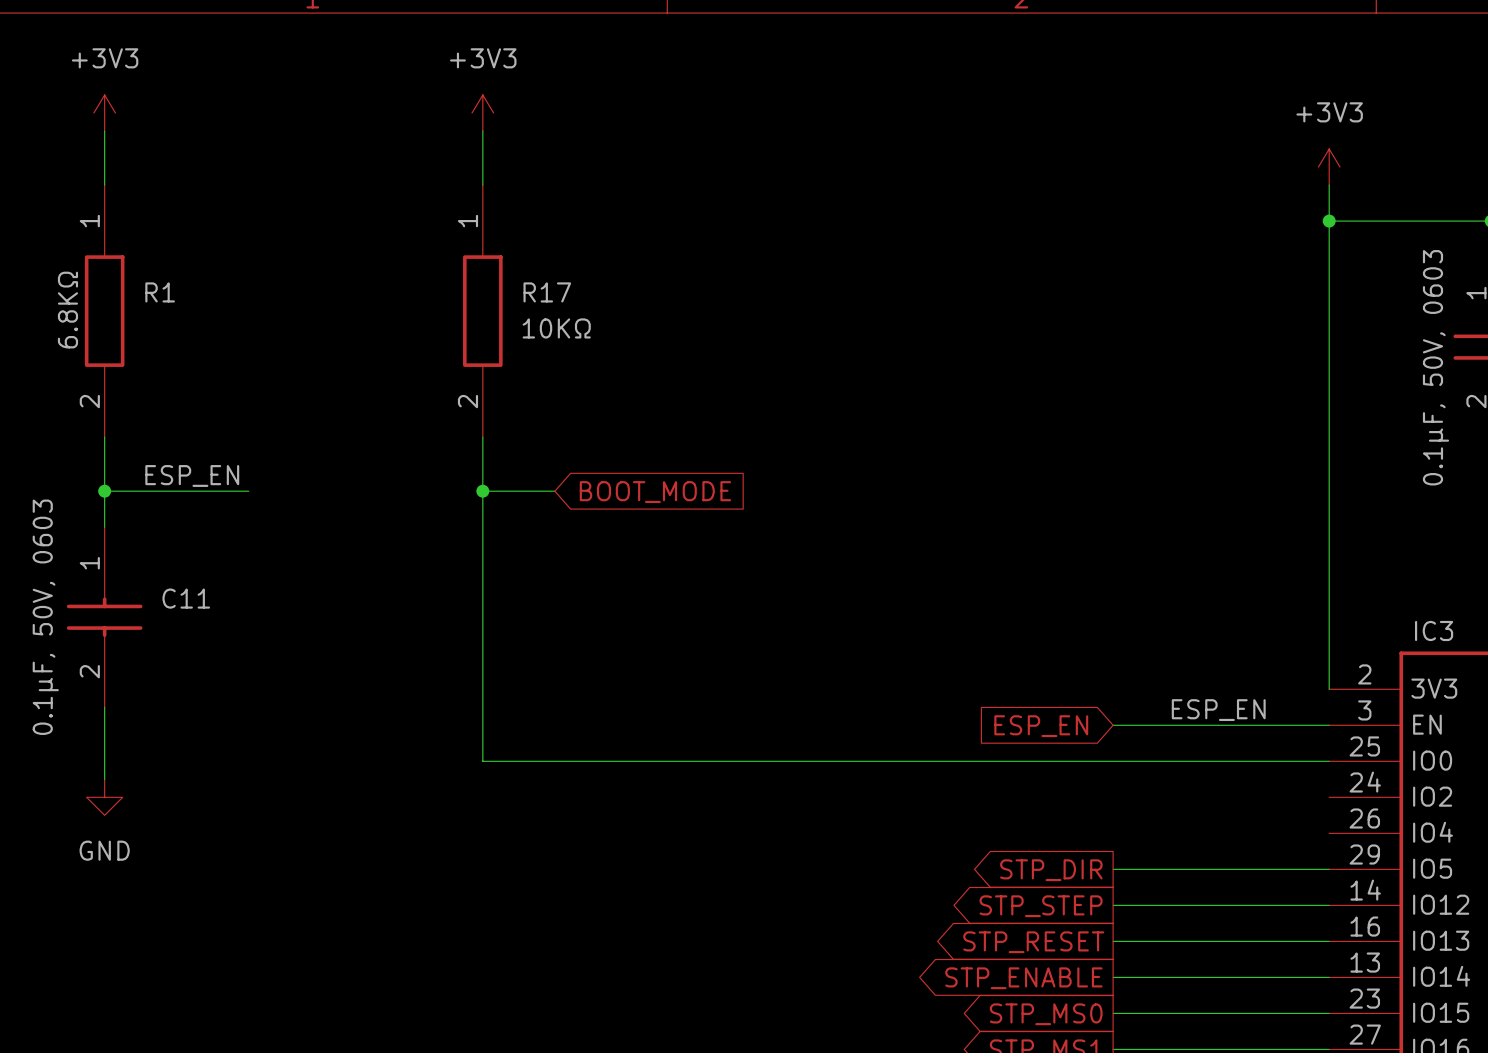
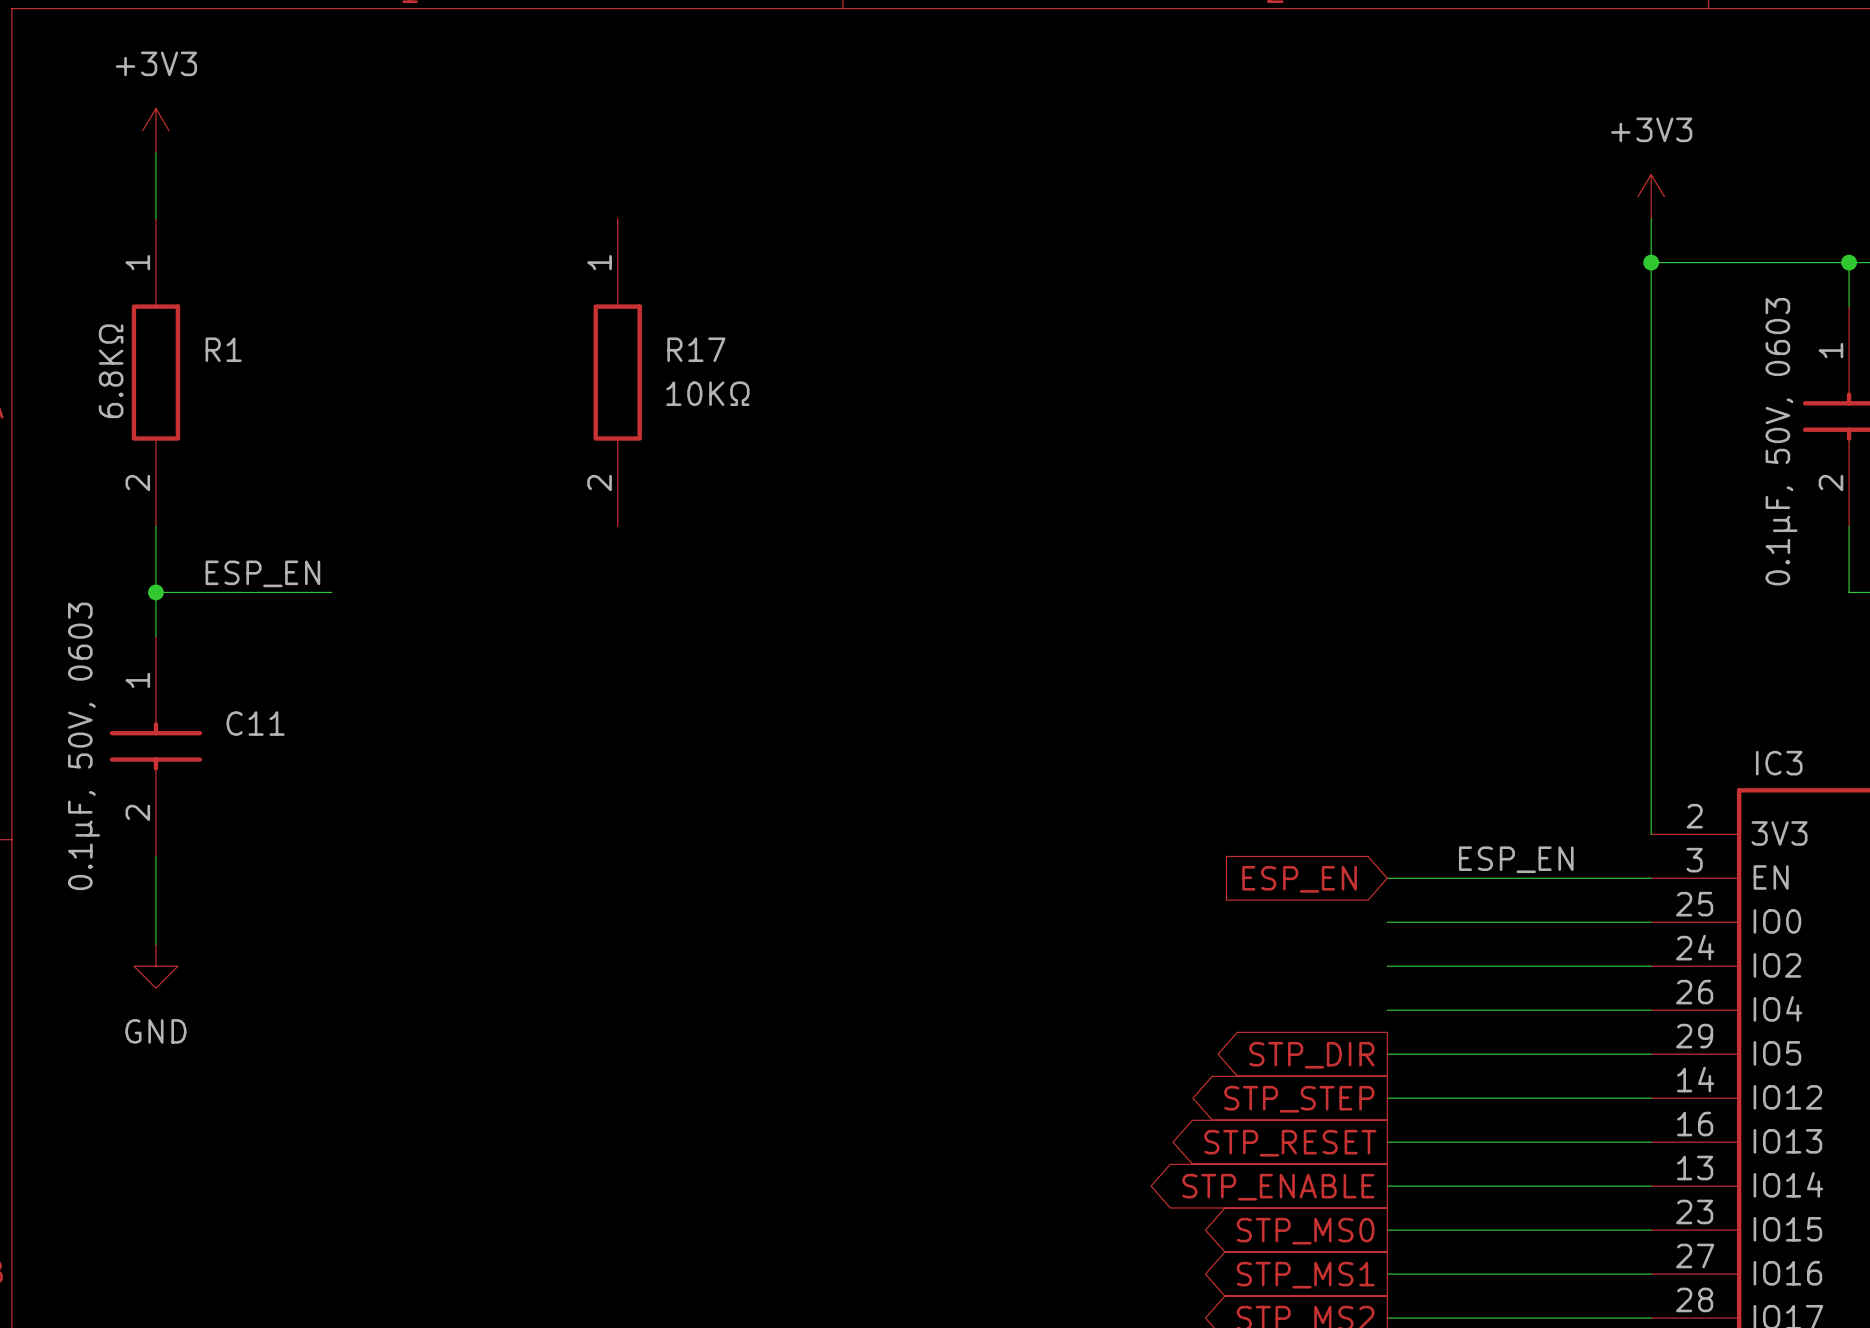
power symbol: +3V3 (482, 113) -> none
wire: (482, 131) (482, 185) -> none
wire: (482, 437) (482, 761) (1113, 761) -> none
wire: (482, 491) (554, 491) -> none
junction: (482, 491) -> none
global label: BOOT_MODE (655, 492) -> none
wire: none -> (1387, 966) (1651, 966)
wire: none -> (1387, 1010) (1651, 1010)

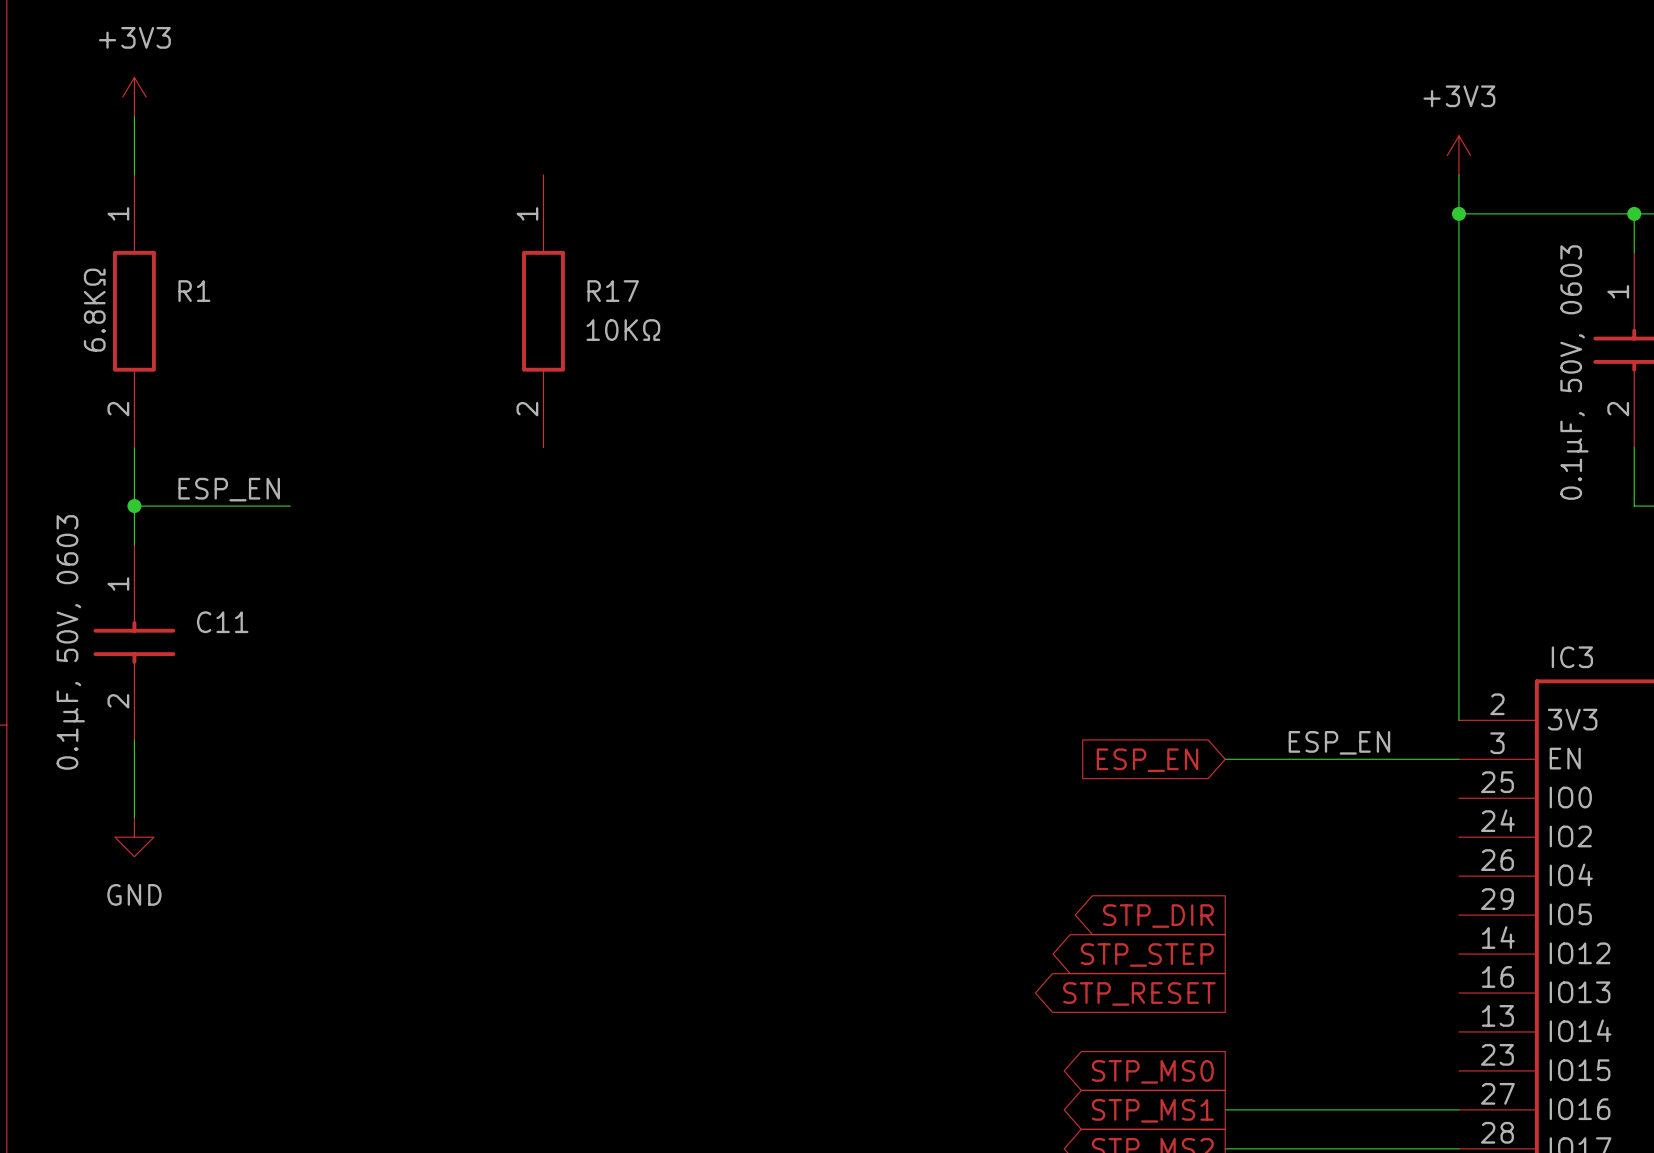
wire: (1387, 922) (1651, 922) -> none
wire: (1387, 966) (1651, 966) -> none
wire: (1387, 1010) (1651, 1010) -> none
wire: (1387, 1054) (1651, 1054) -> none
wire: (1387, 1098) (1651, 1098) -> none
wire: (1387, 1142) (1651, 1142) -> none
wire: (1387, 1186) (1651, 1186) -> none
global label: STP_ENABLE (1278, 1187) -> none
wire: (1387, 1230) (1651, 1230) -> none

